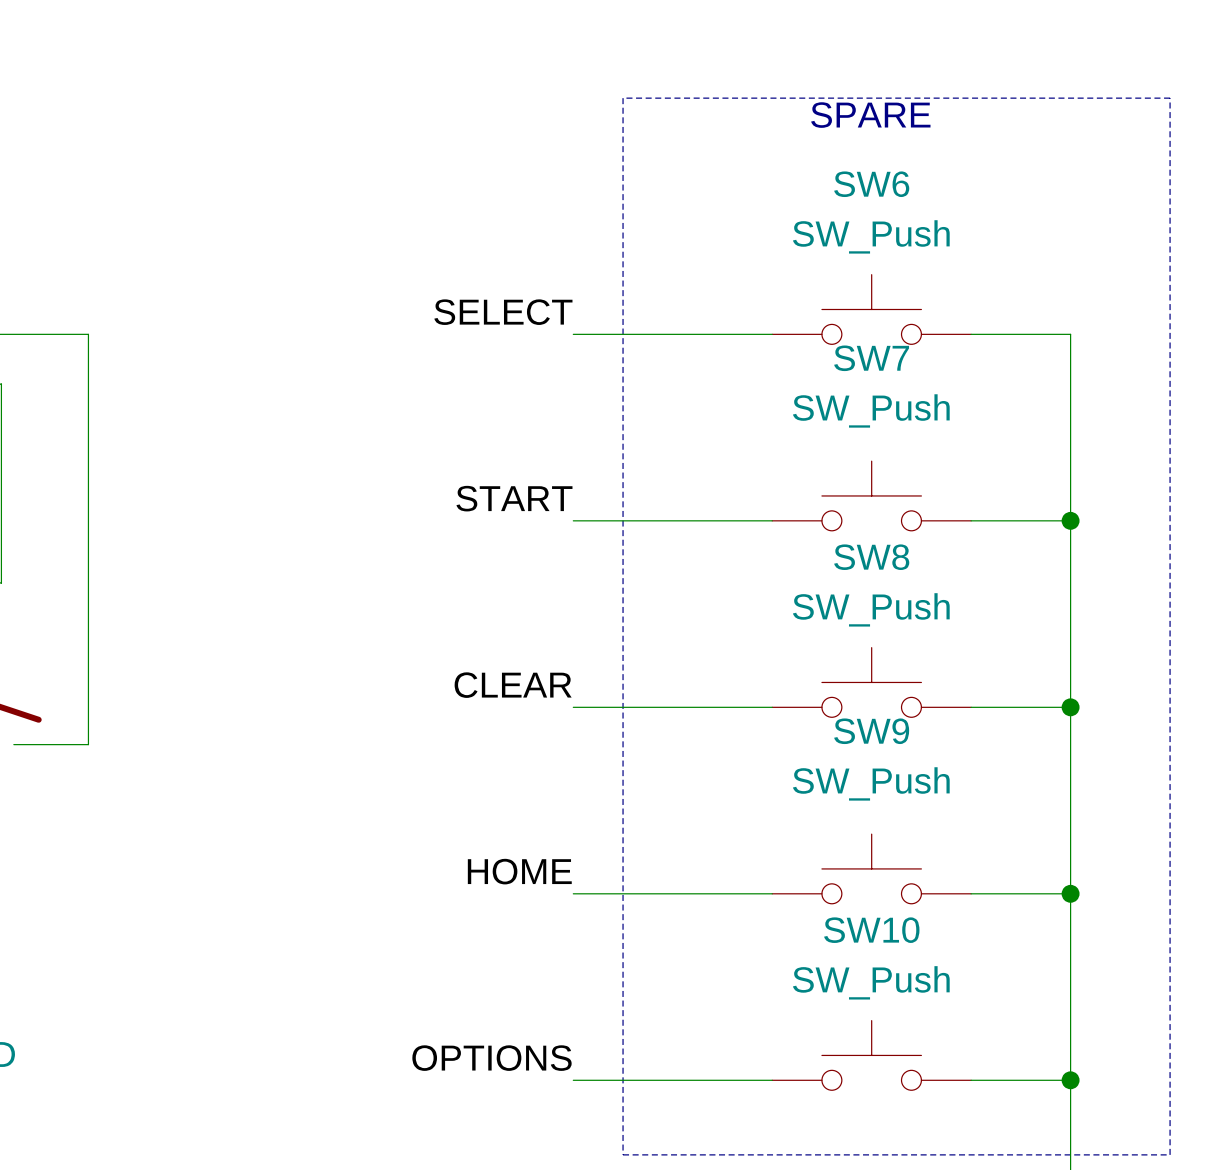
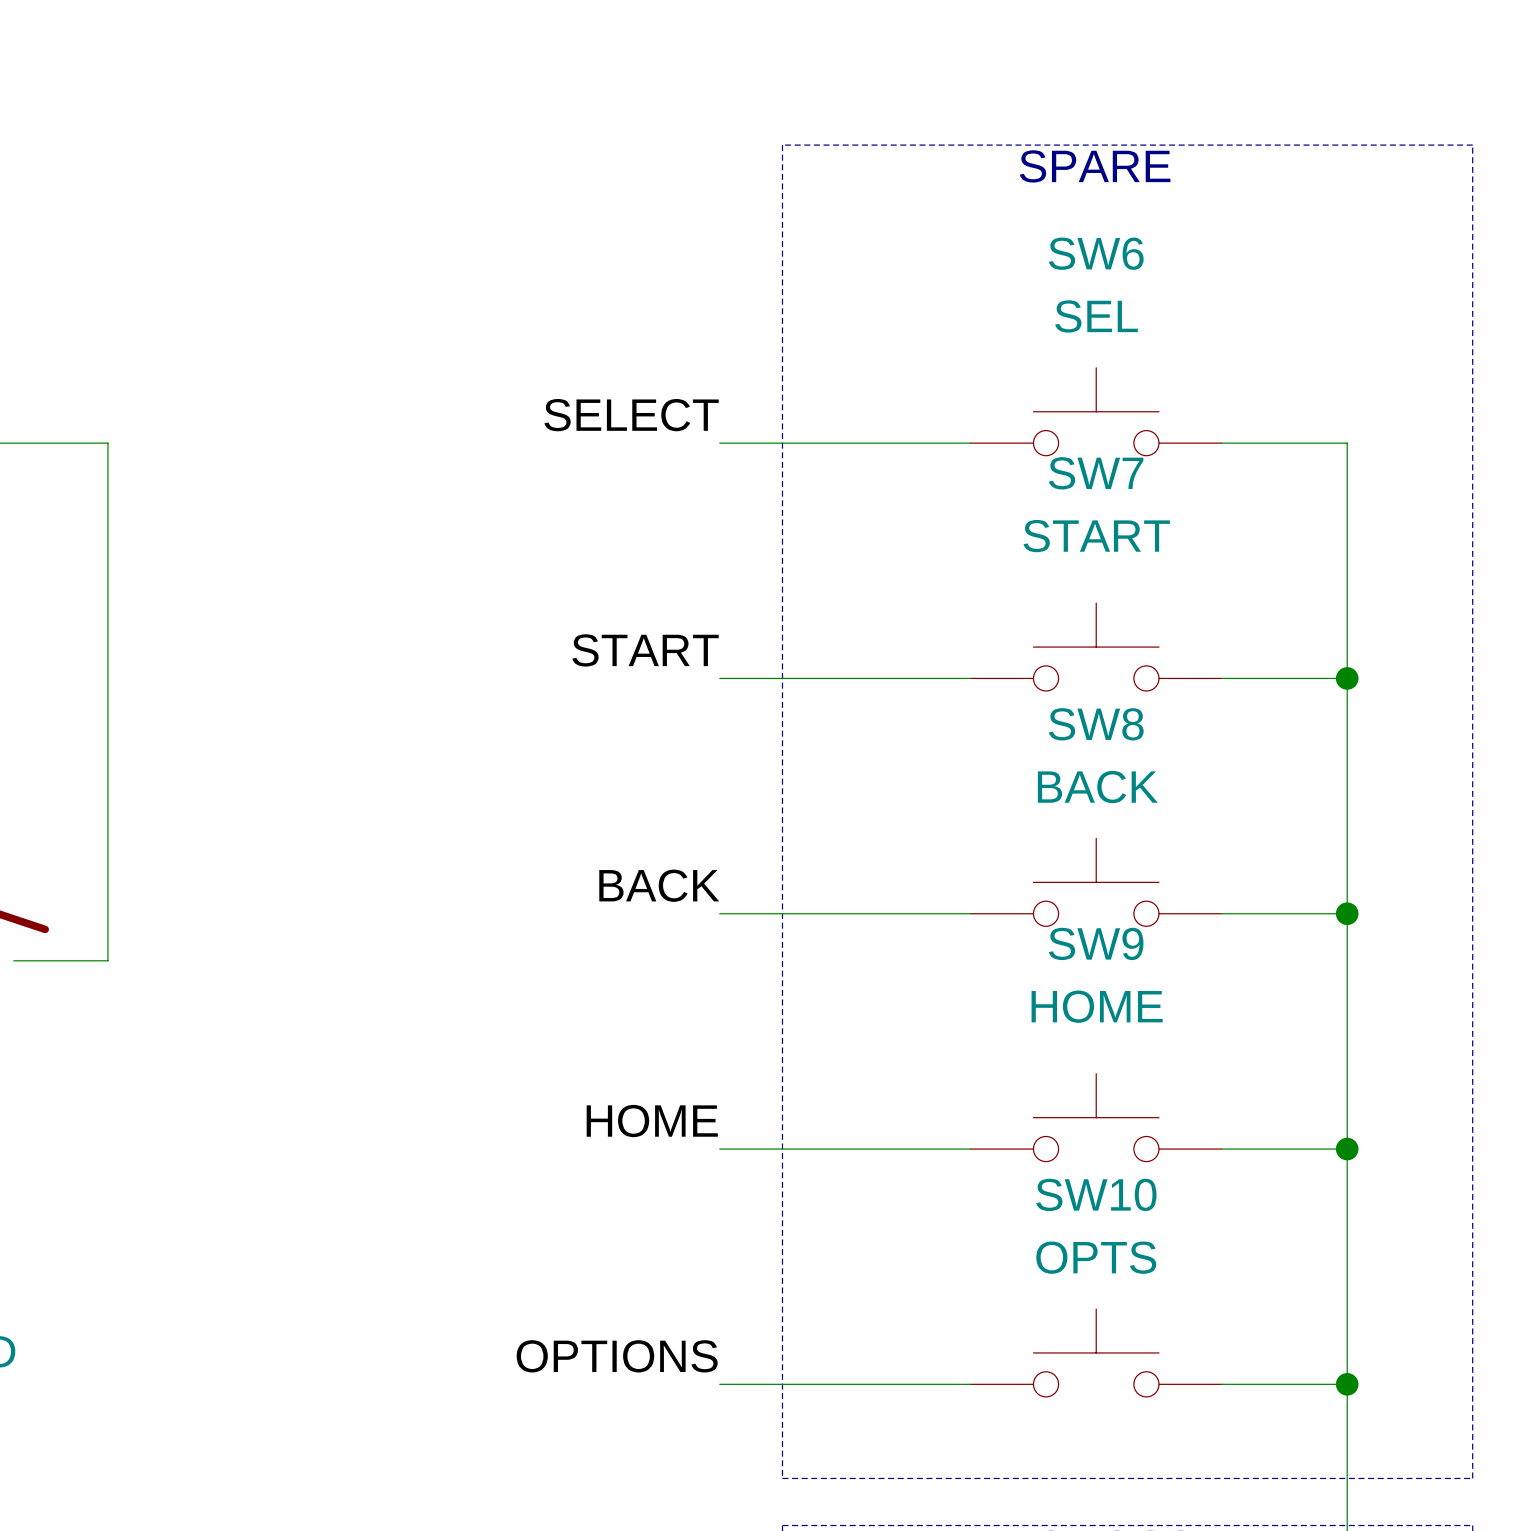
SW6 value: SW_Push (871, 236) -> SEL (1096, 316)
SW7 value: SW_Push (871, 410) -> START (1096, 536)
SW8 value: SW_Push (871, 609) -> BACK (1097, 787)
label: CLEAR (513, 685) -> BACK (659, 885)
SW9 value: SW_Push (871, 783) -> HOME (1097, 1006)
SW10 value: SW_Push (871, 982) -> OPTS (1096, 1257)

